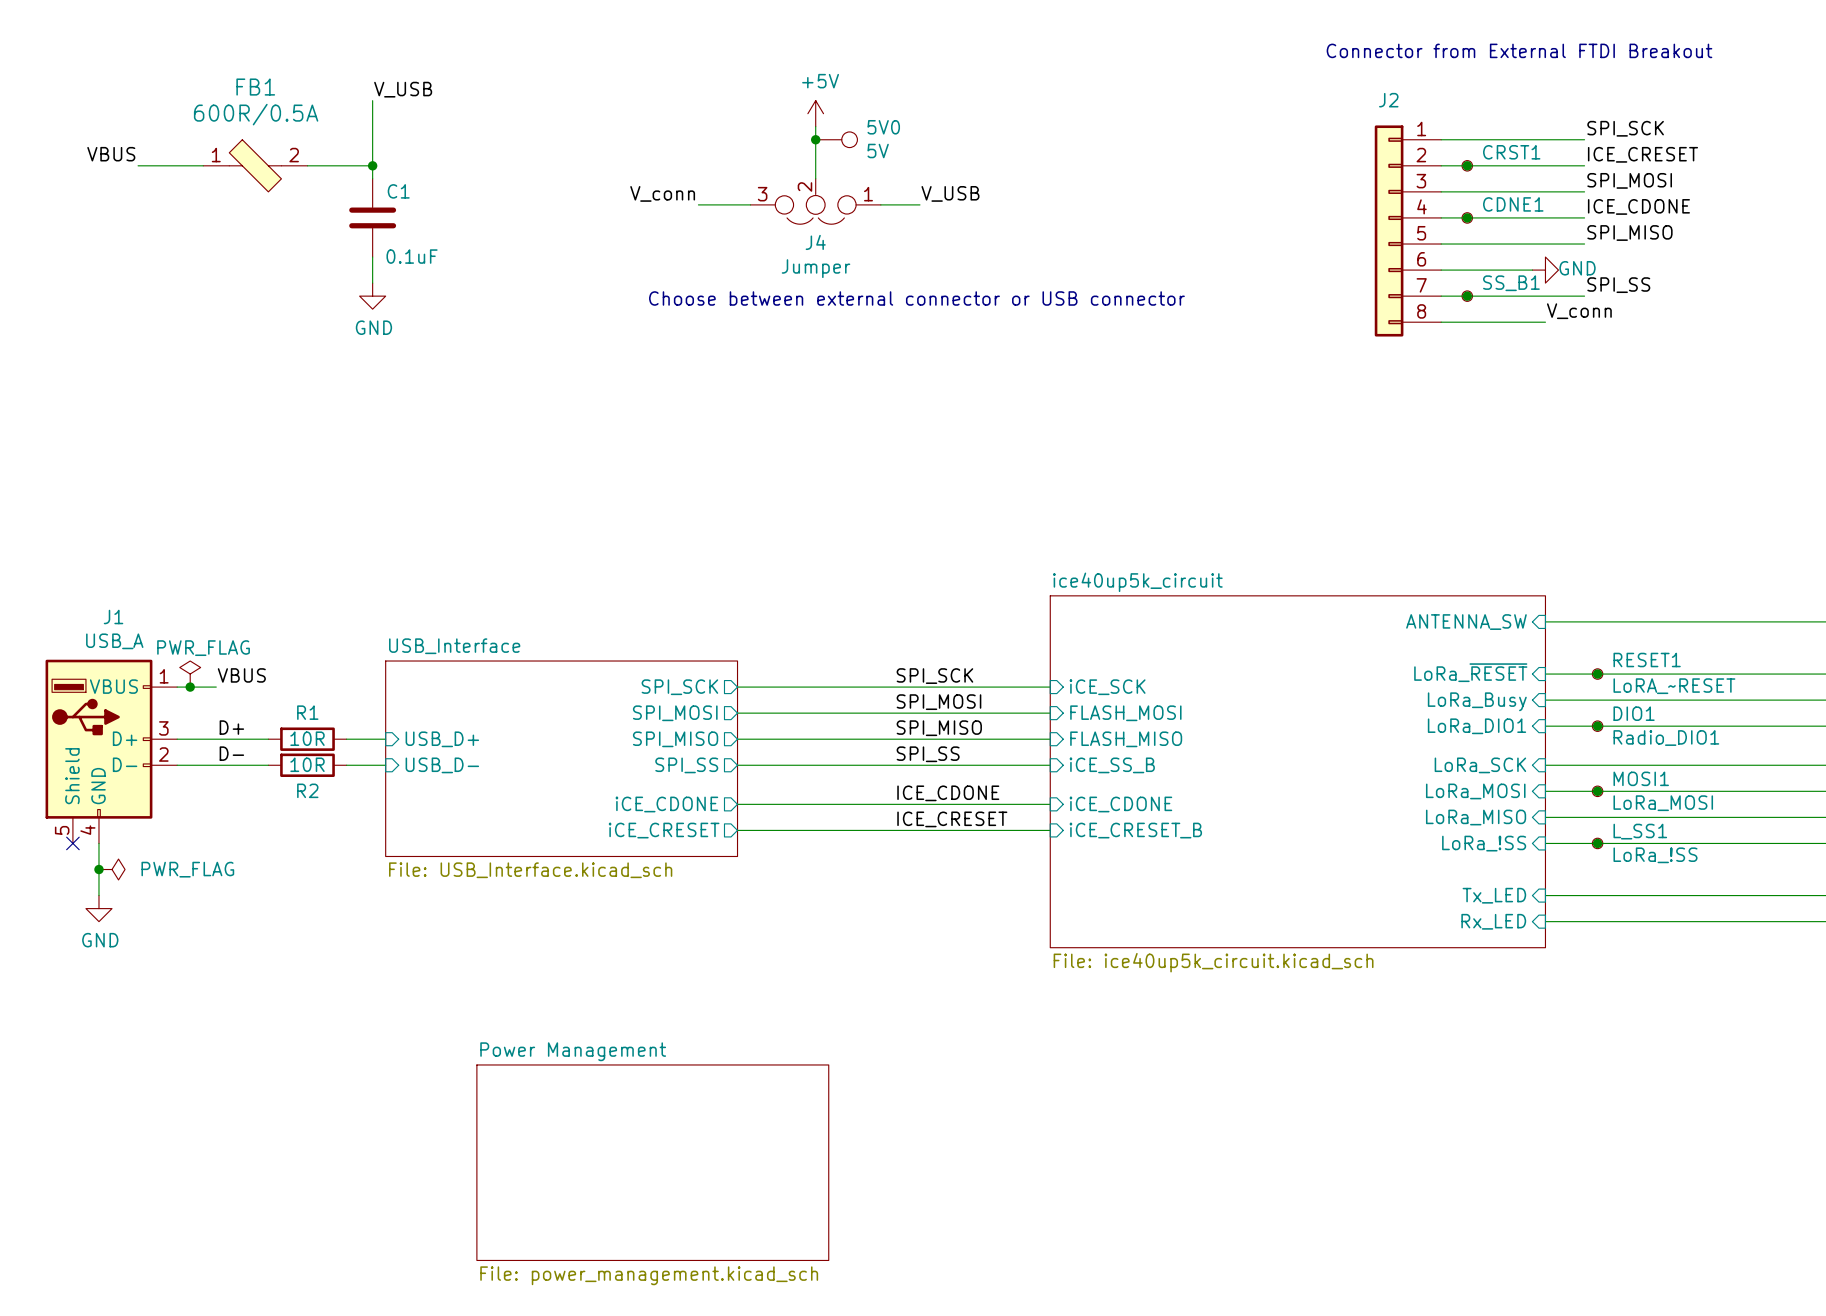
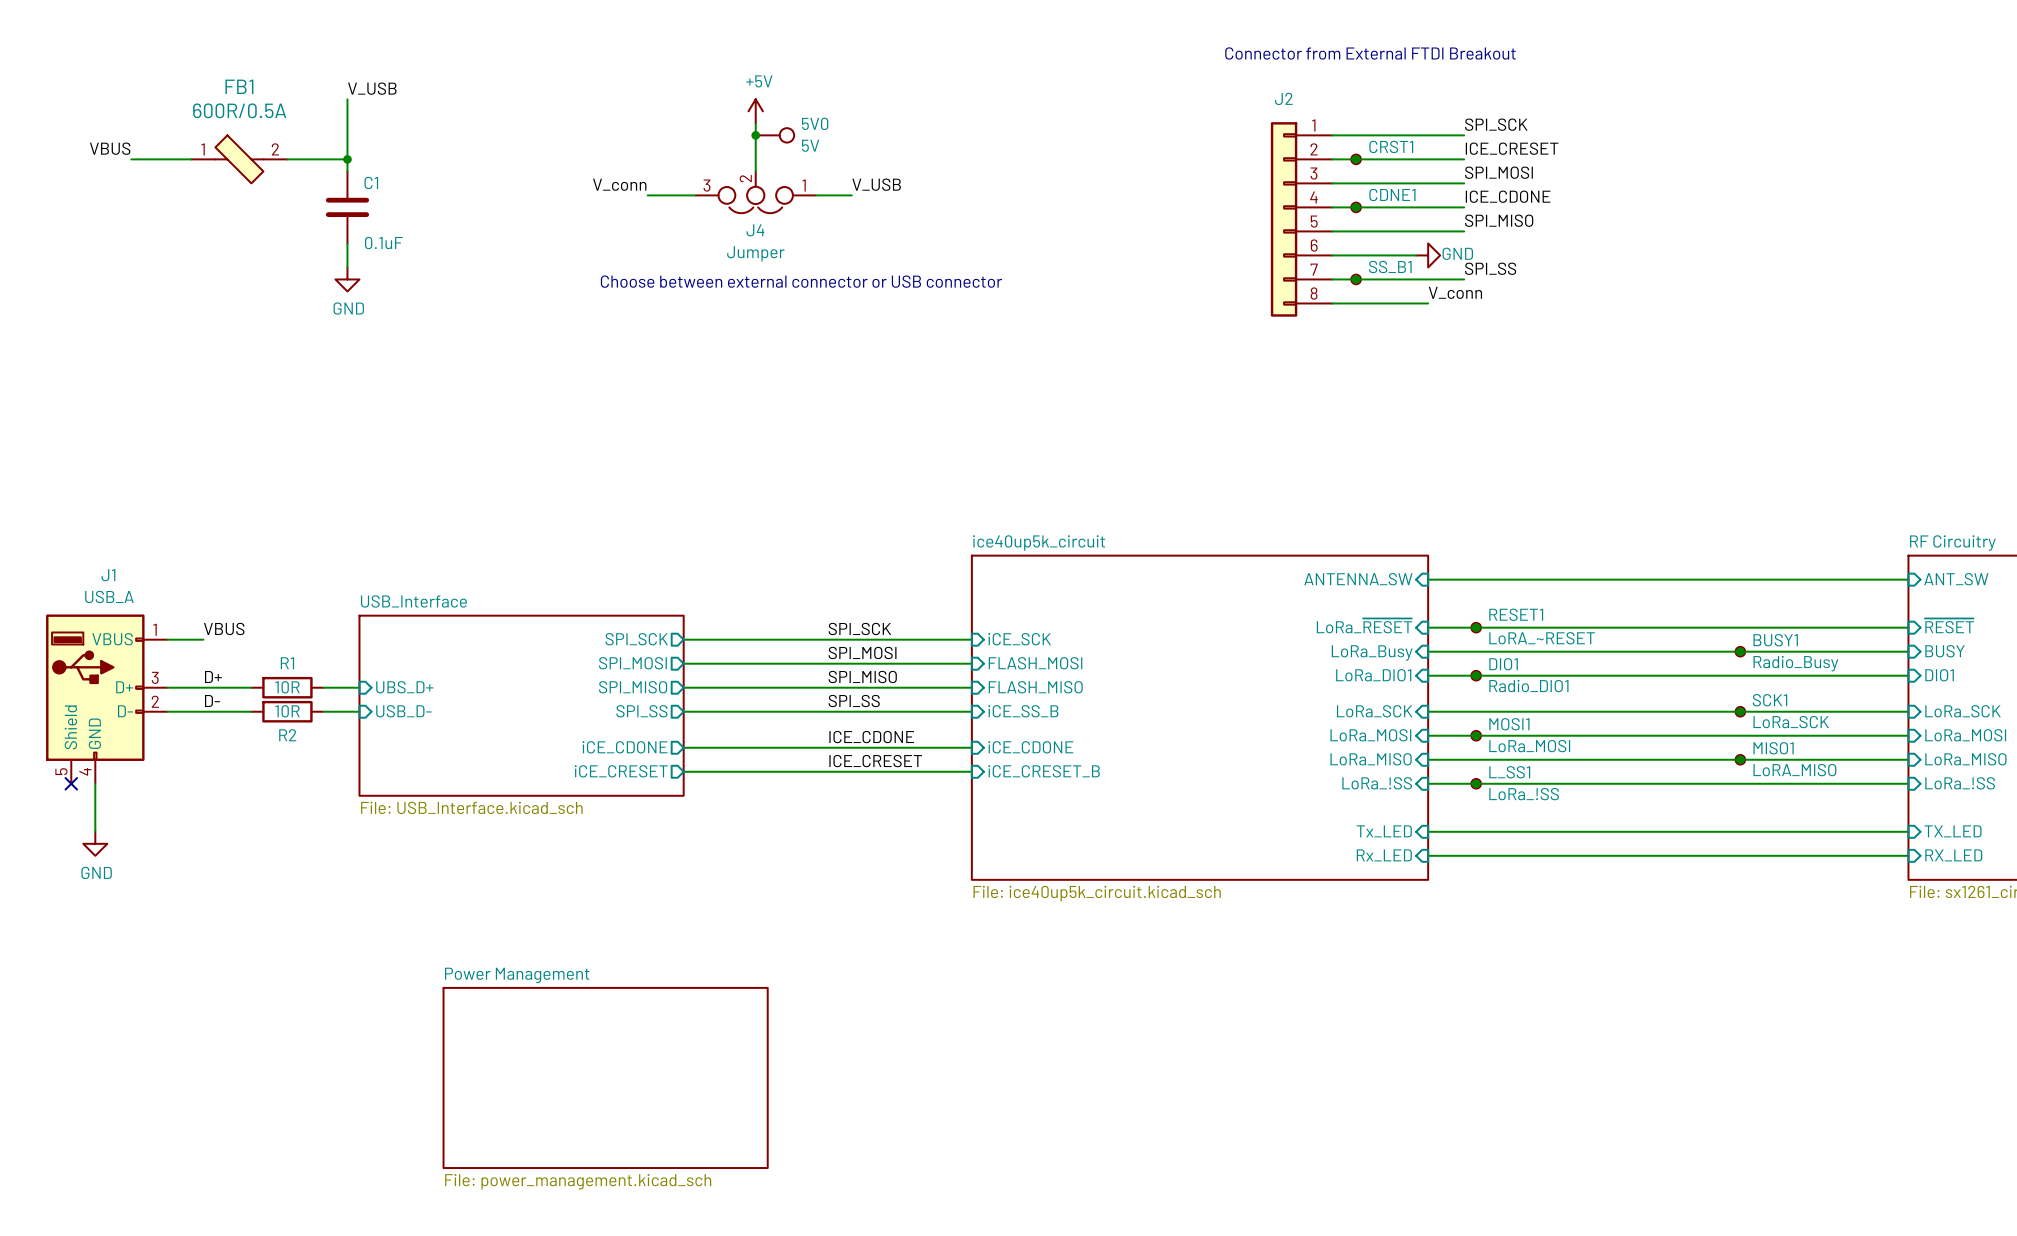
power symbol: PWR_FLAG (190, 674) -> none
junction: (190, 687) -> none
sheet pin: USB_D+ (442, 739) -> UBS_D+ (404, 687)
junction: (98, 869) -> none
power symbol: PWR_FLAG (112, 869) -> none

